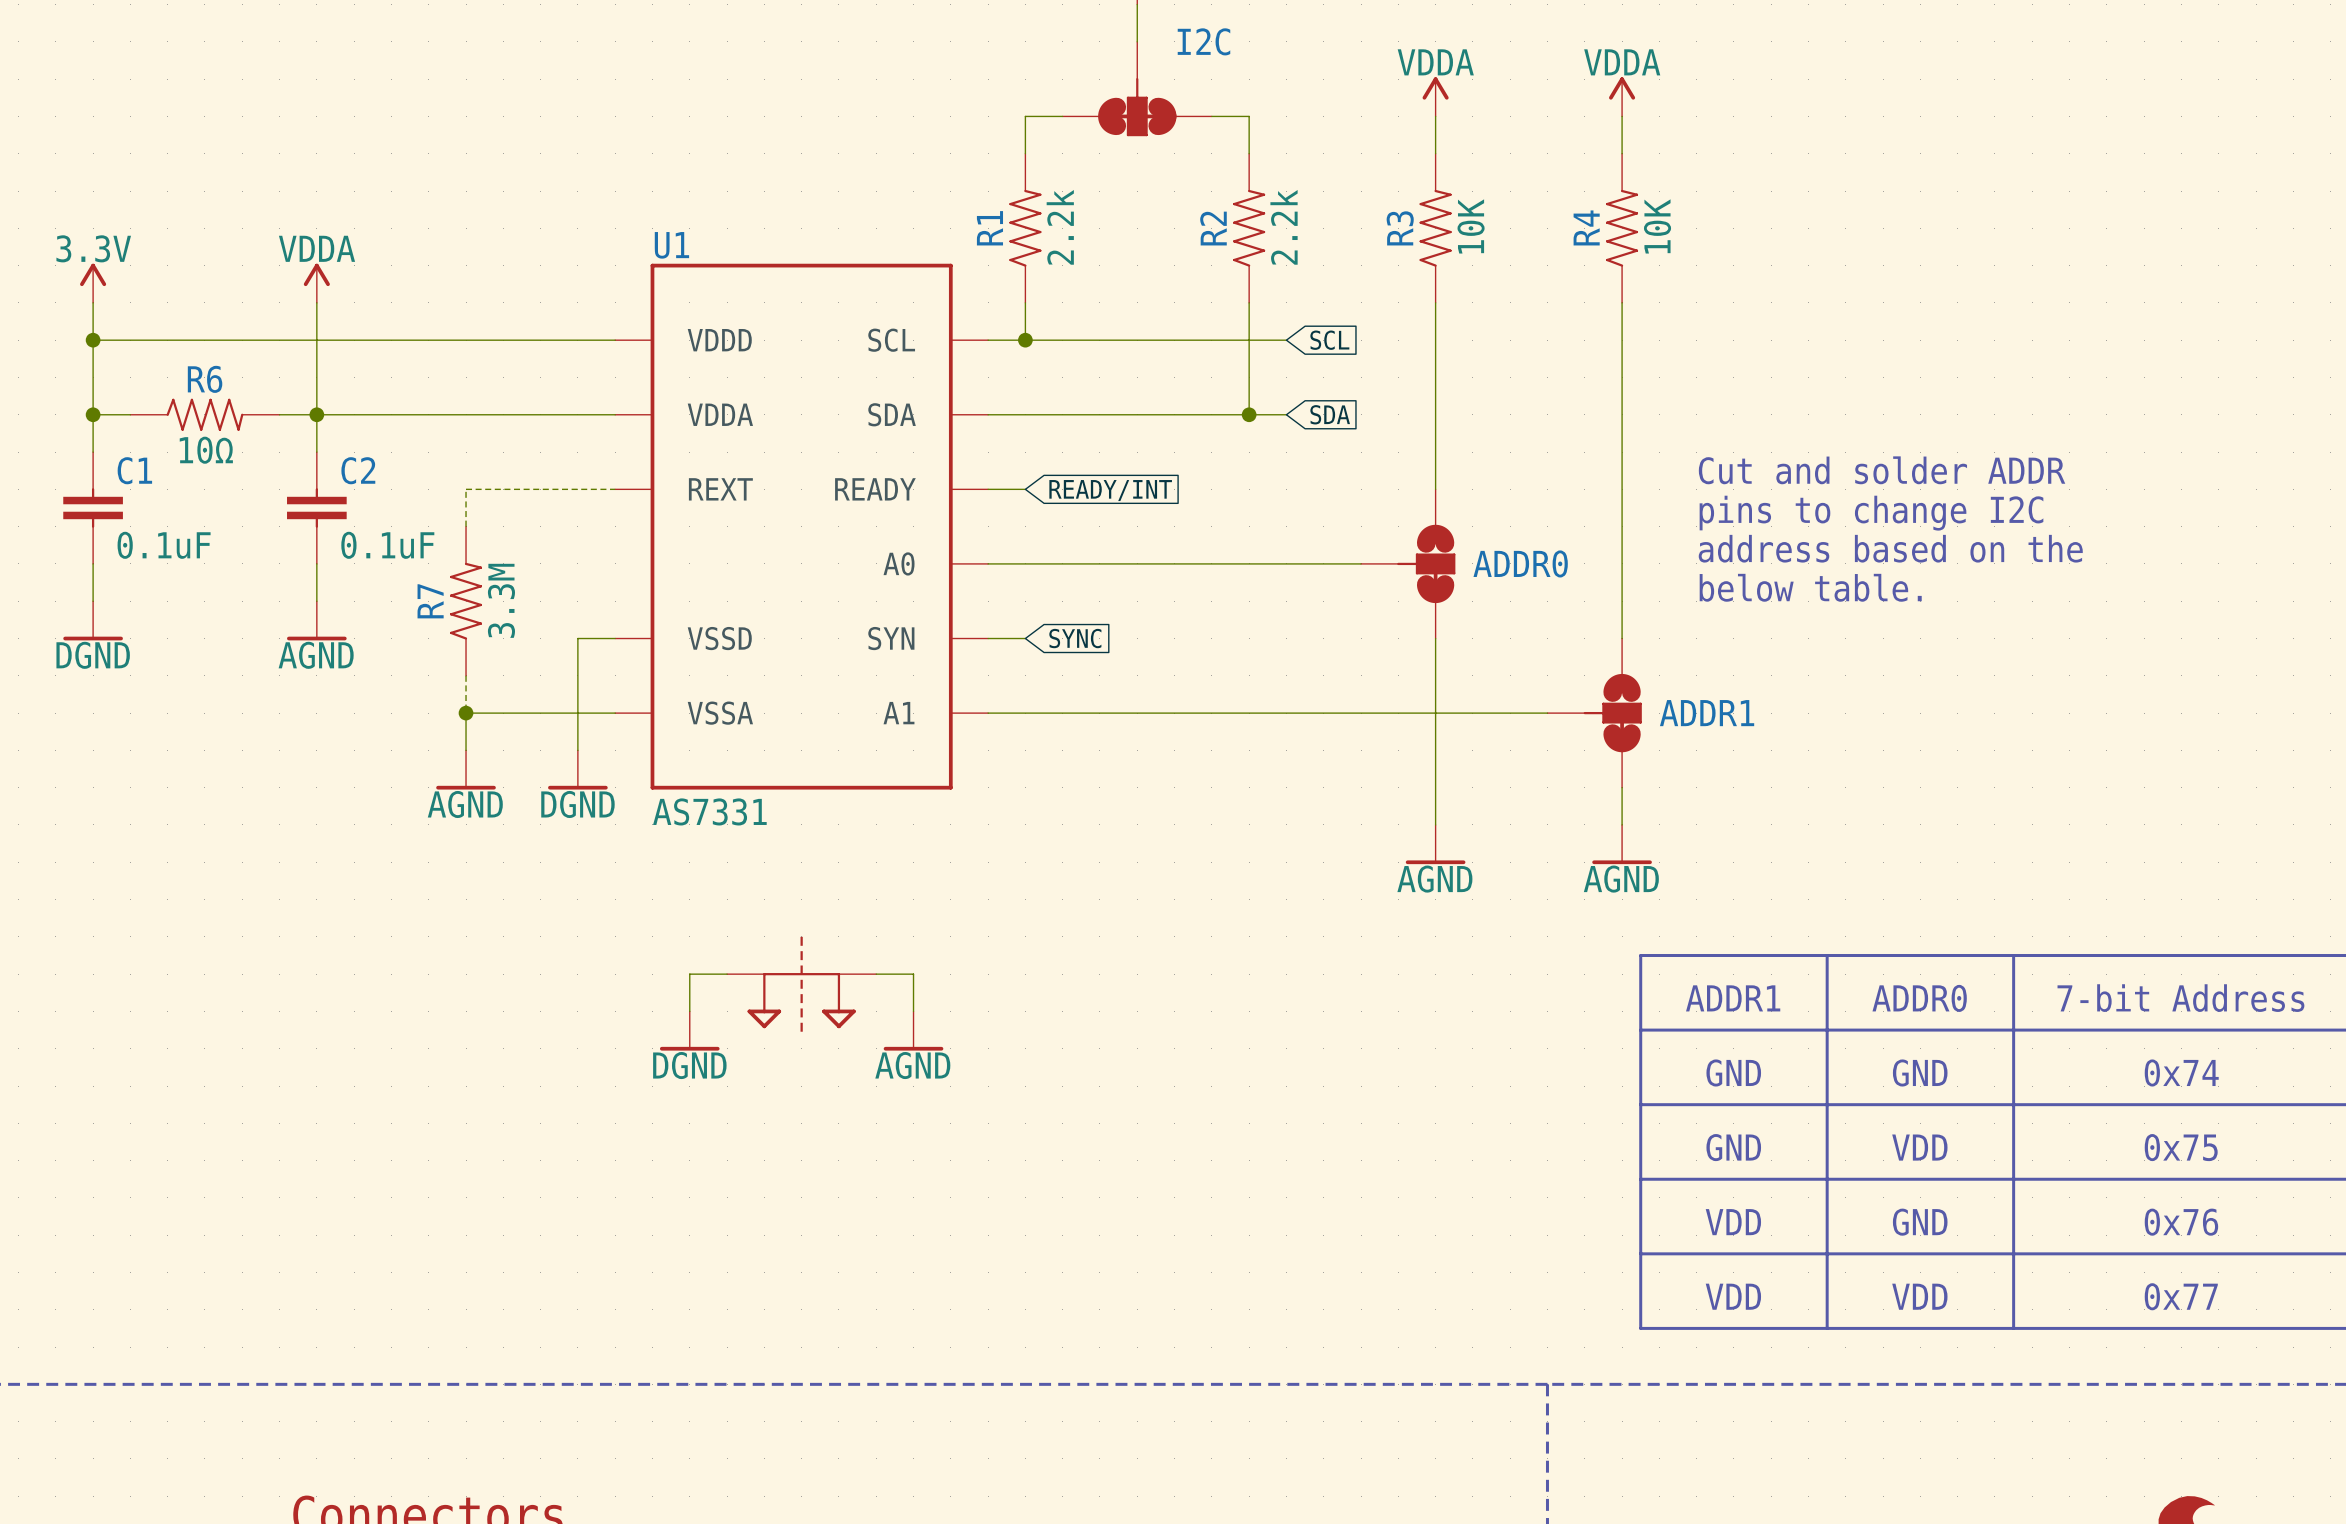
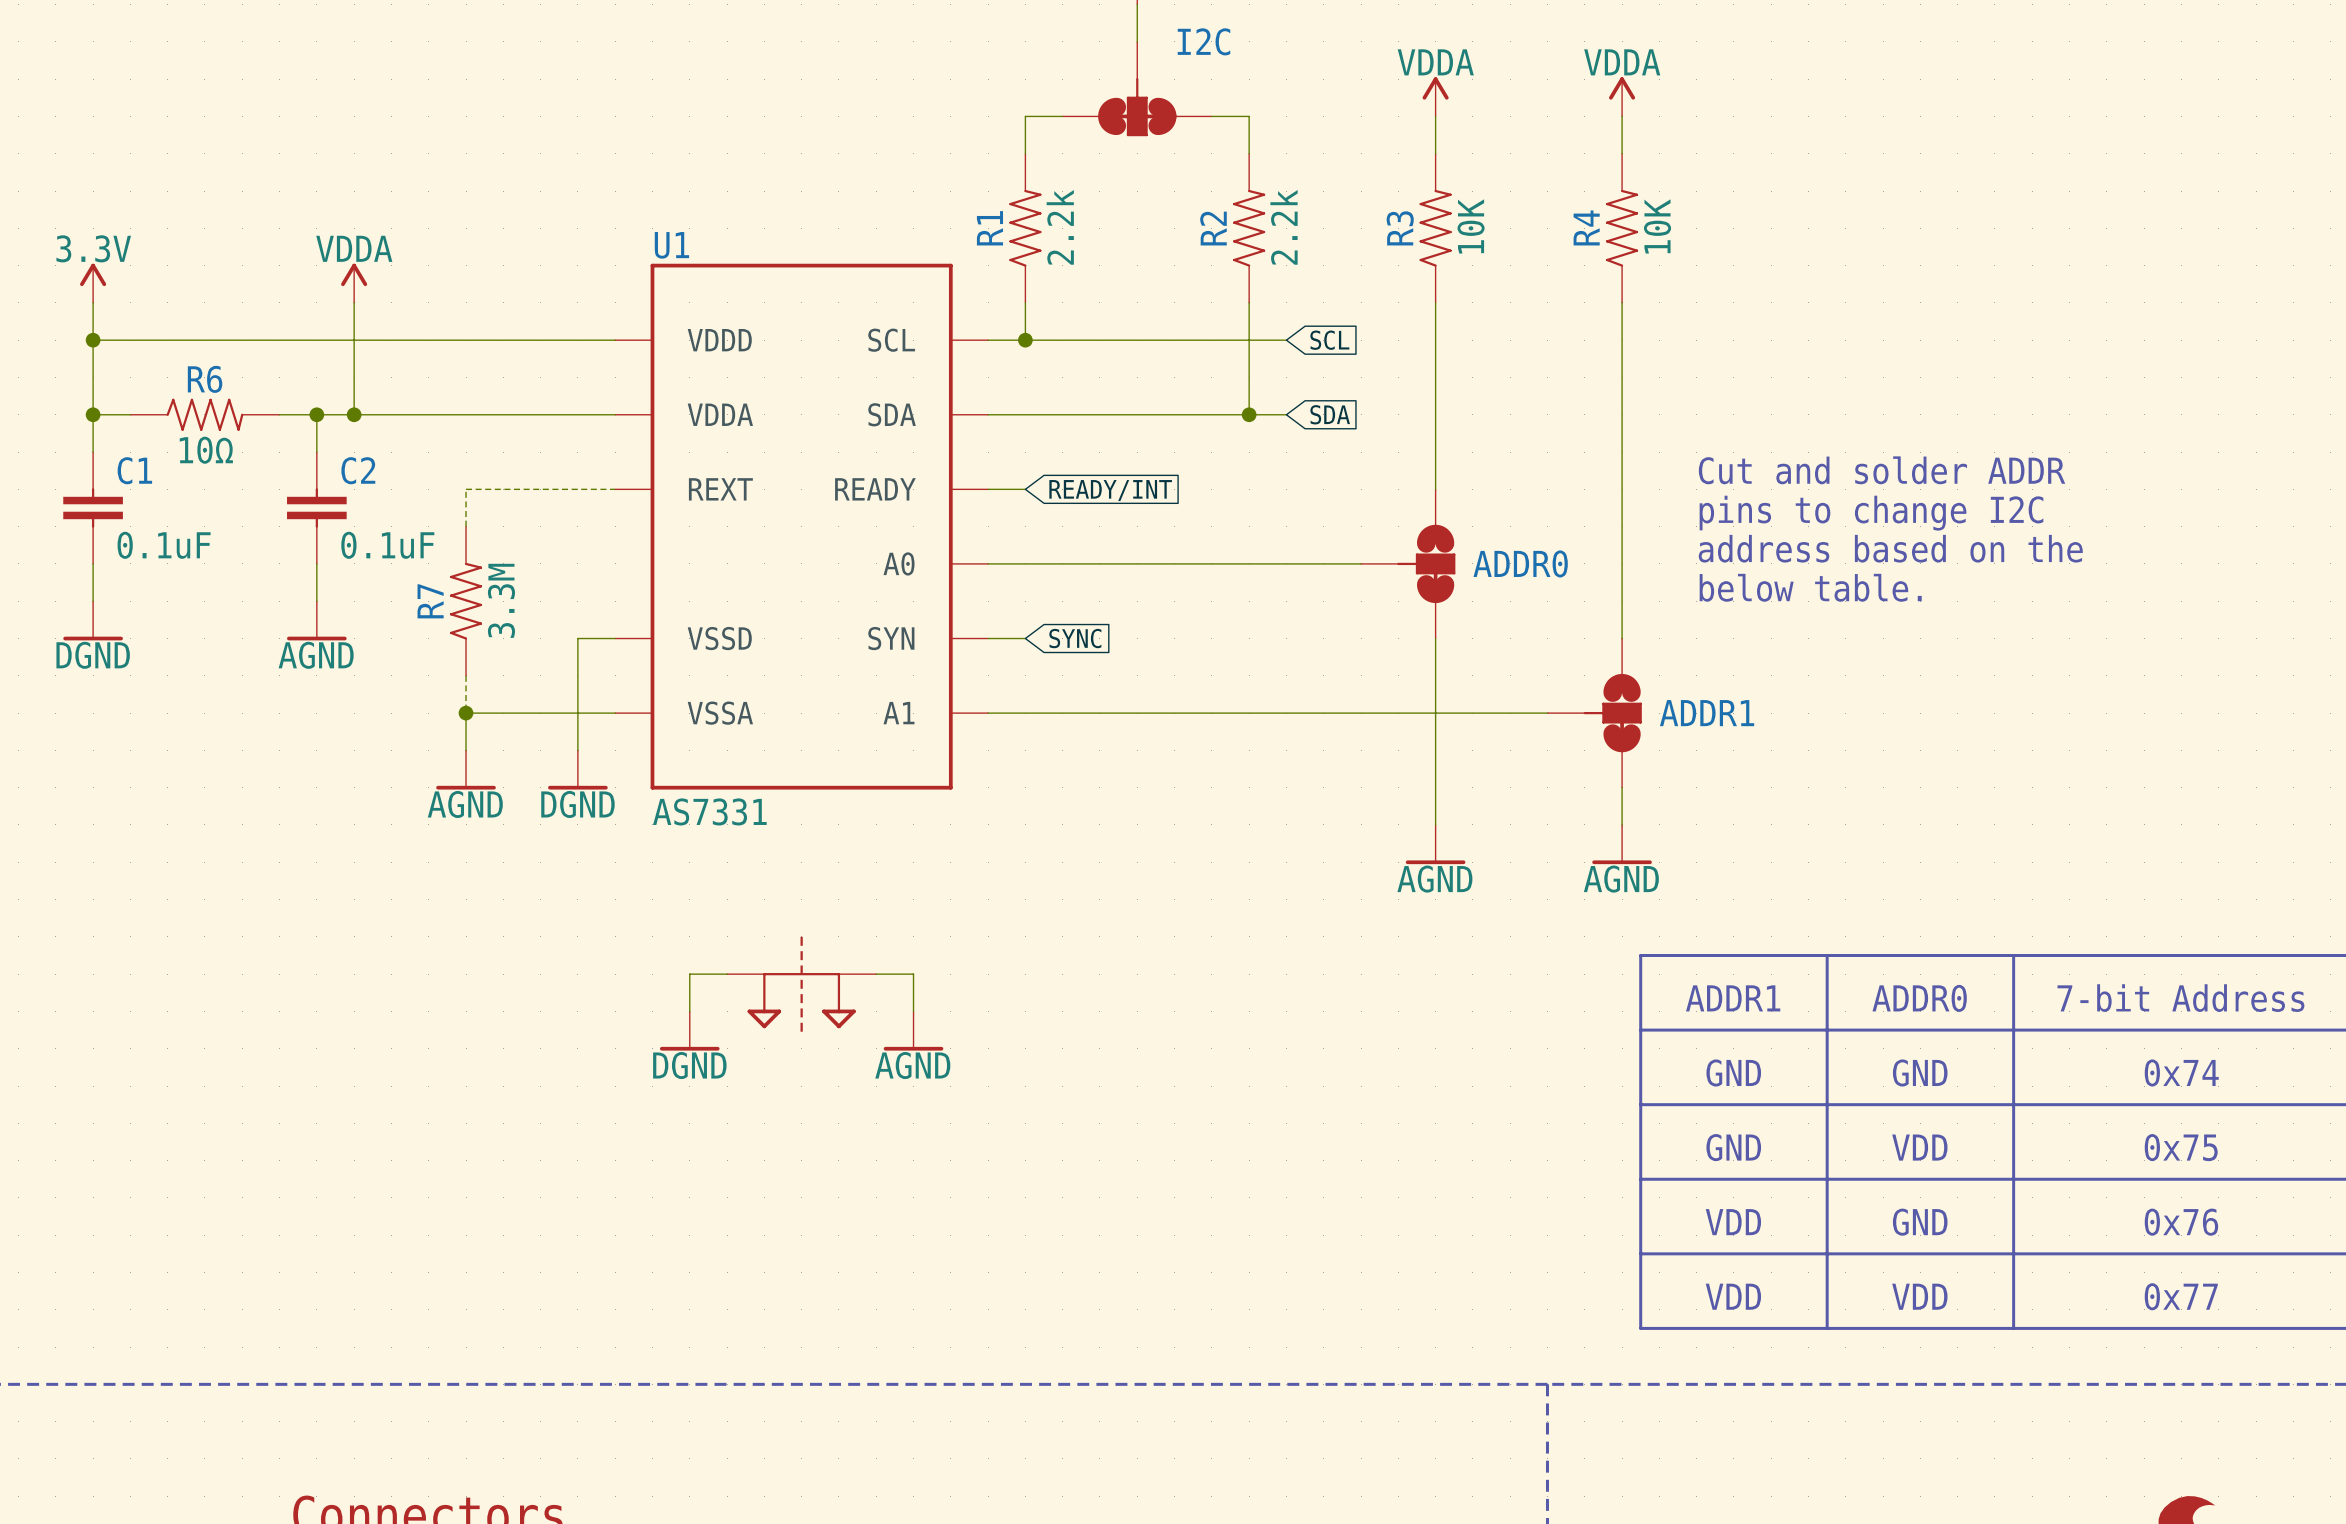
power symbol position: VDDA (316, 283) -> VDDA (354, 283)
wire: (316, 302) (316, 414) -> (354, 302) (354, 414)
junction: none -> (354, 414)

